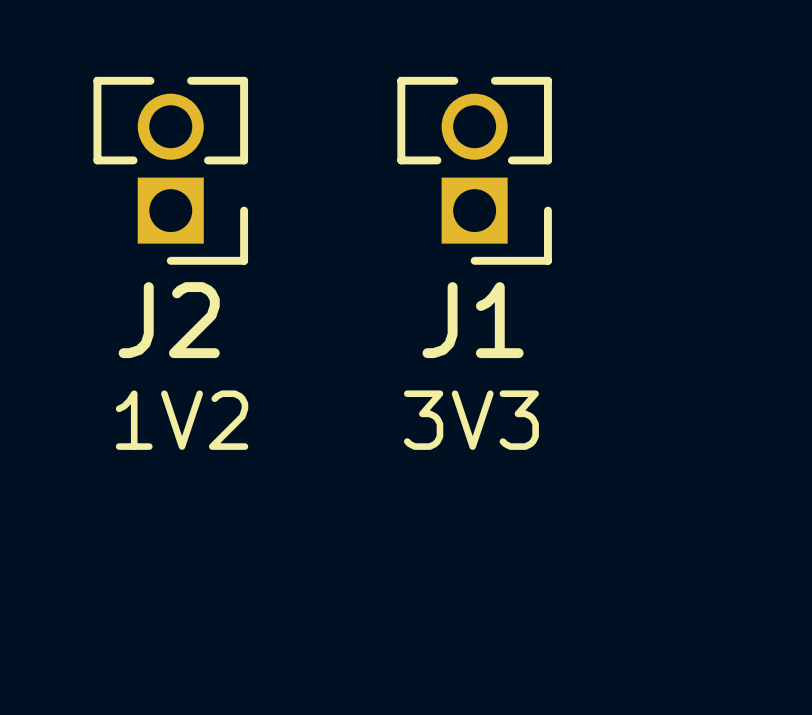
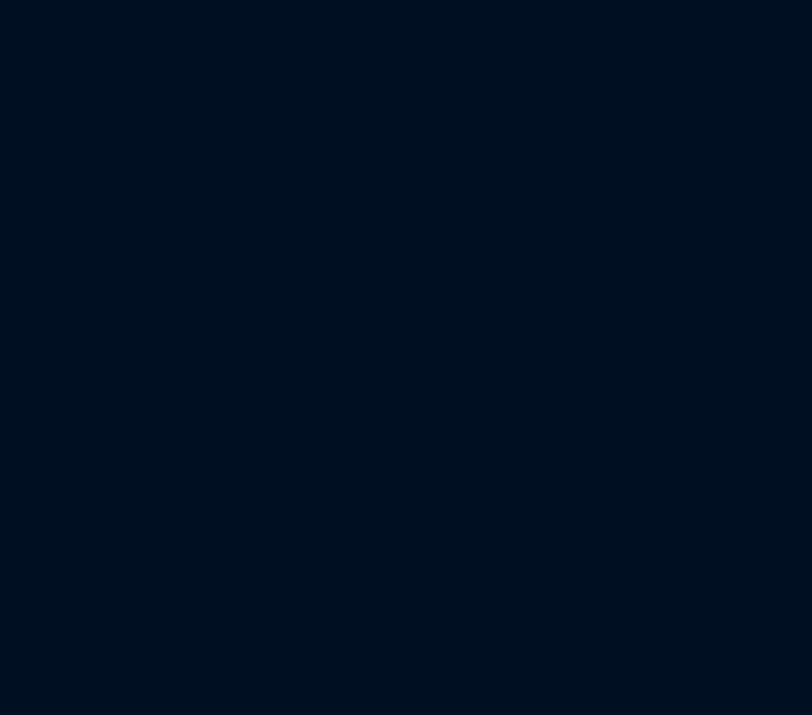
J2: (170, 170) -> none
J1: (474, 170) -> none
text: 1V2 (182, 420) -> none
text: 3V3 (471, 420) -> none

